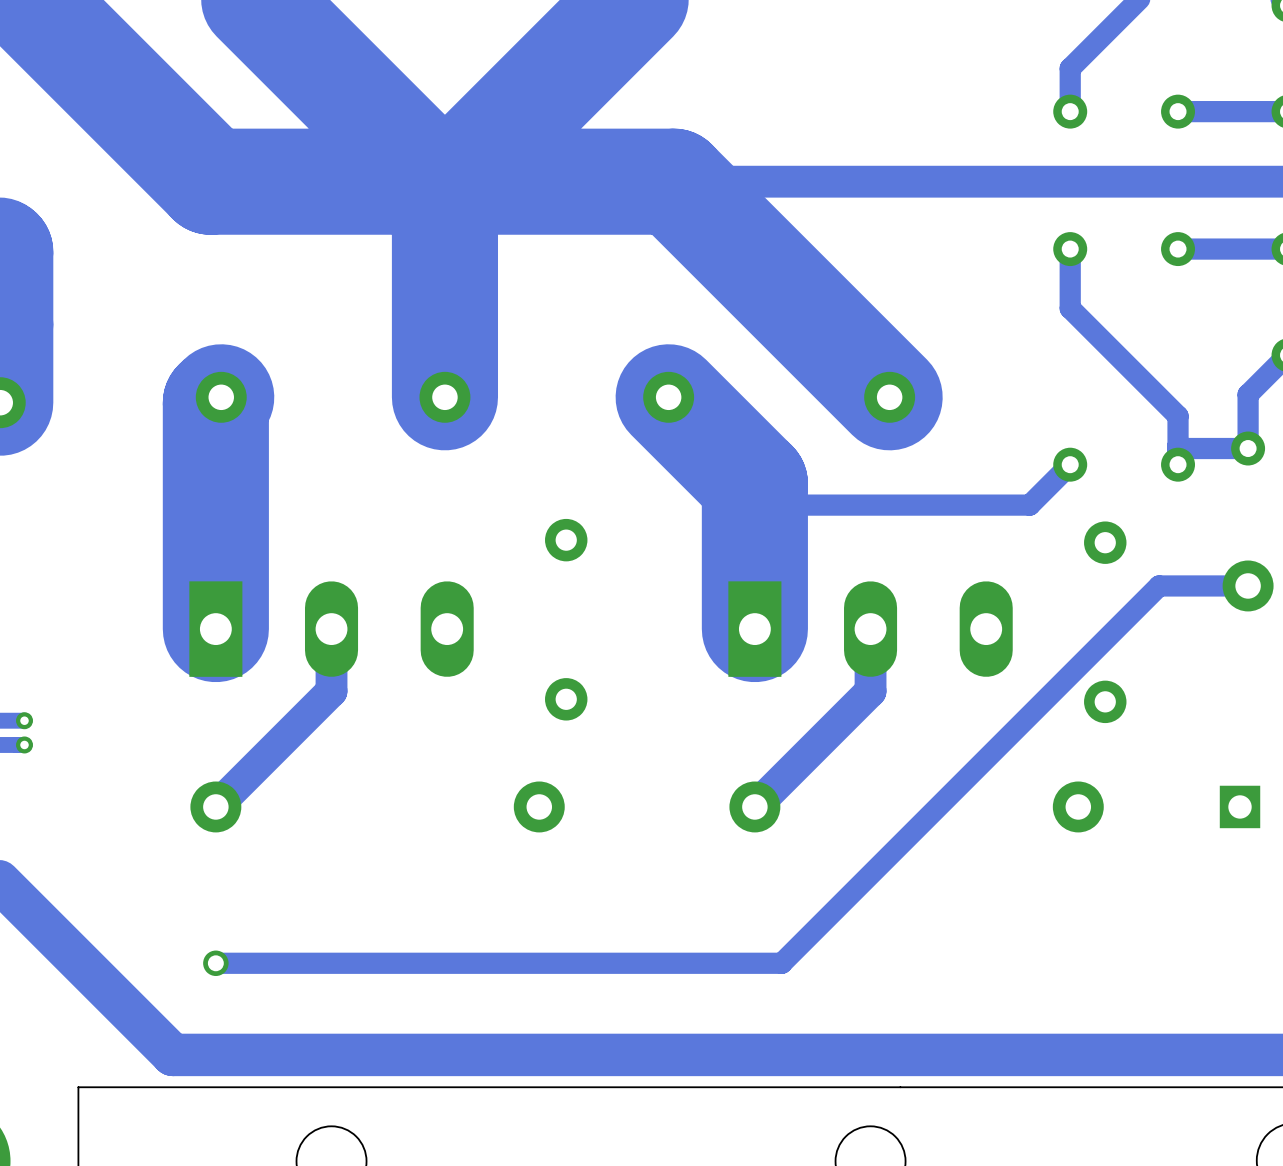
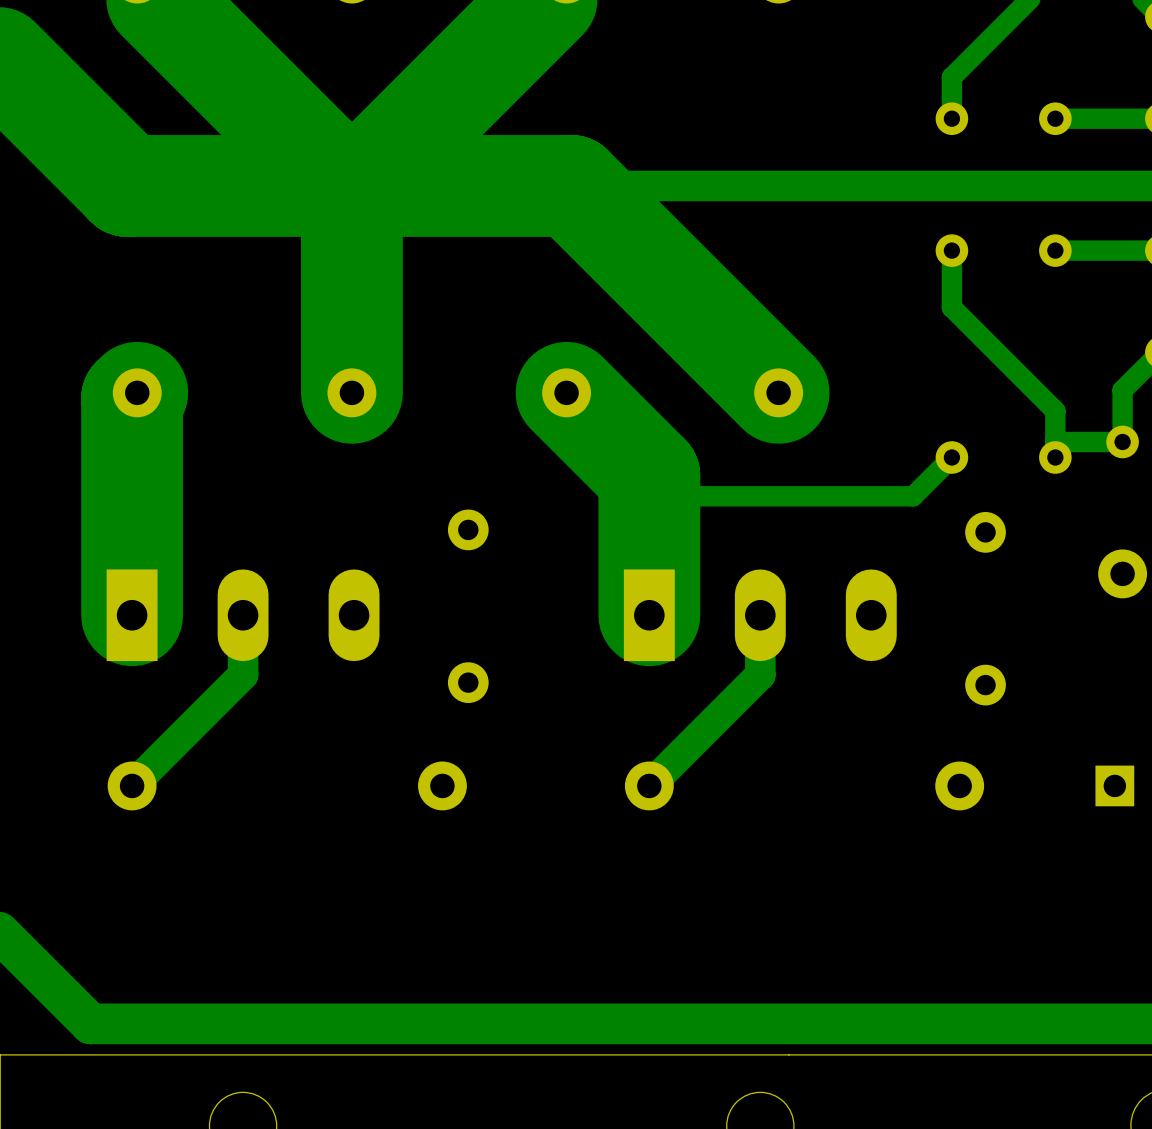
track: (1248, 585) (1159, 585) (781, 963) (215, 963) -> none
via: (215, 963) -> none

